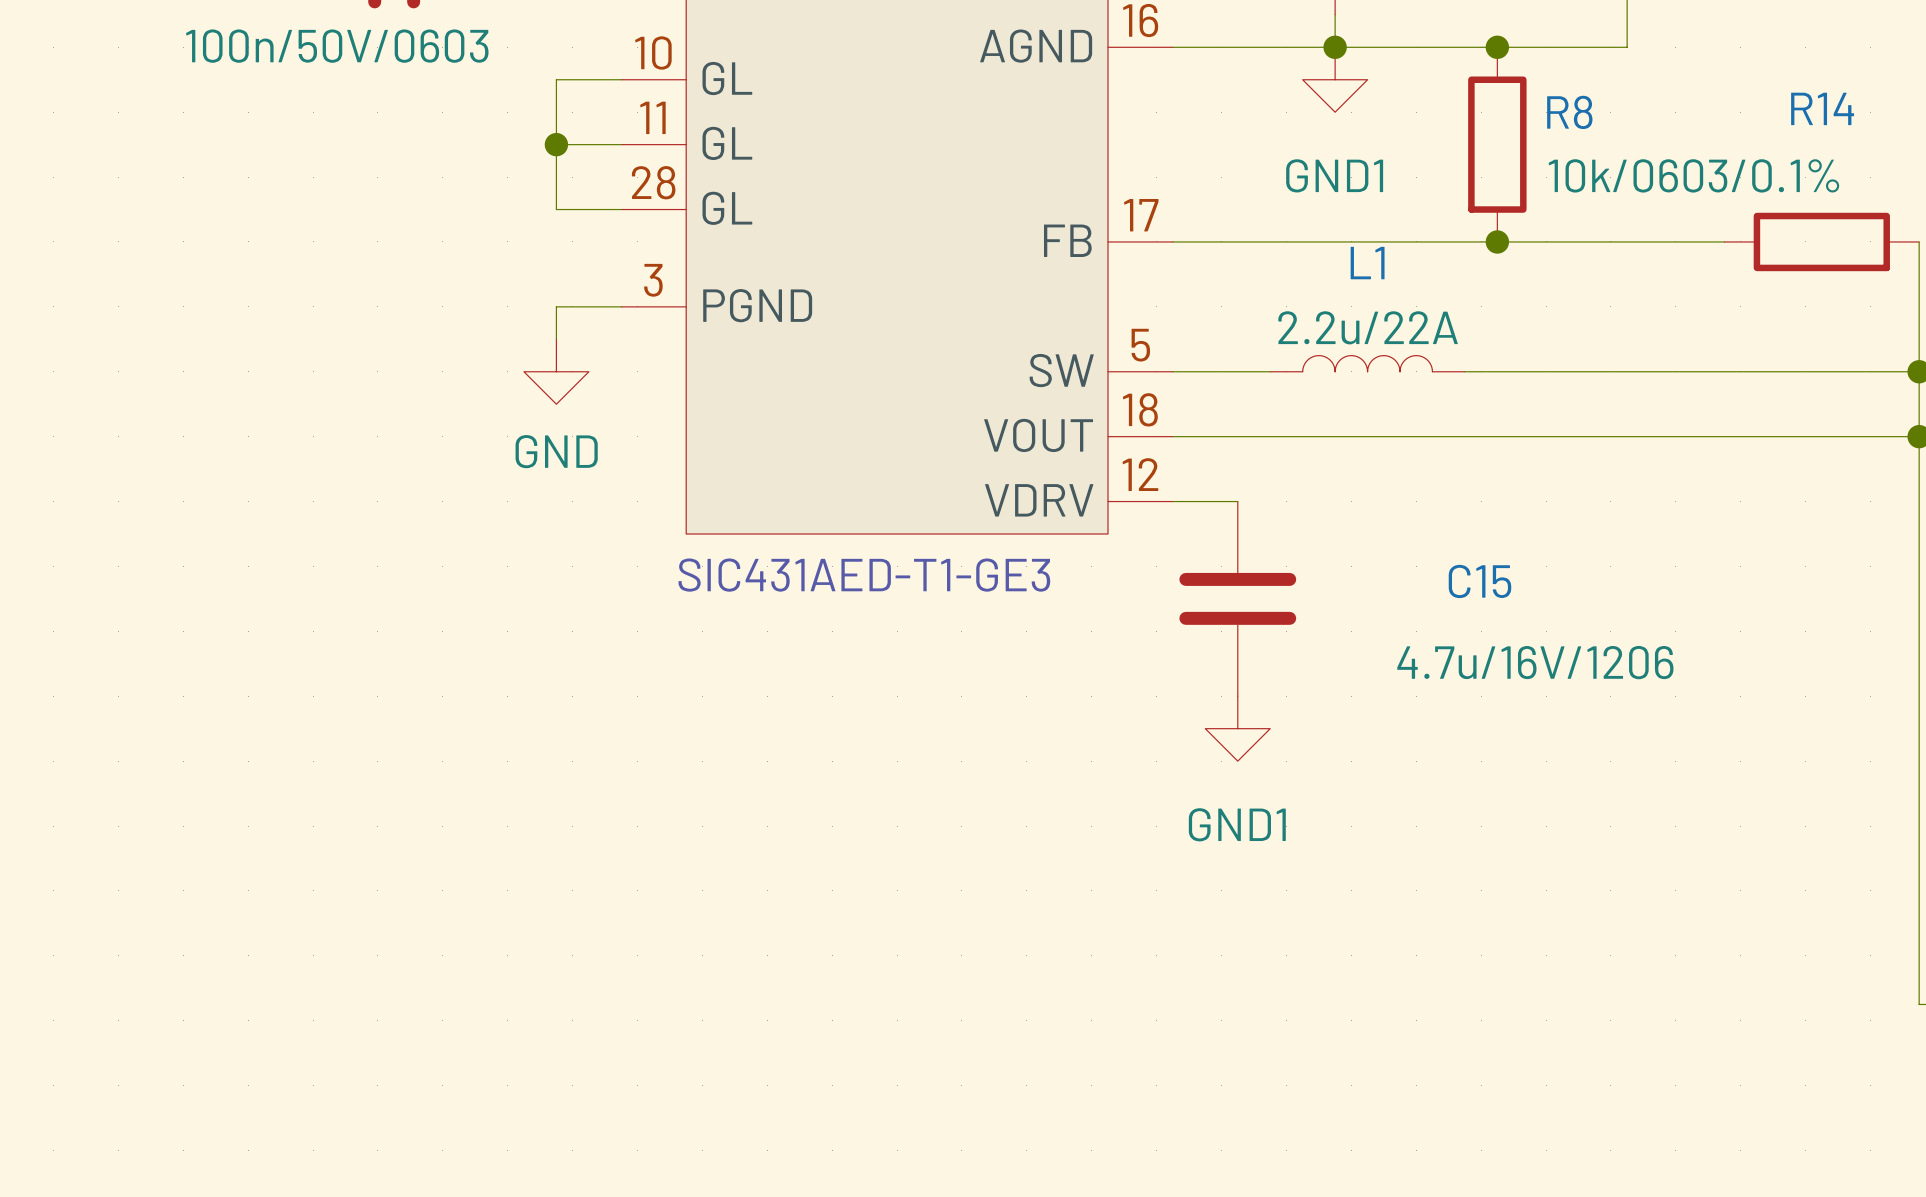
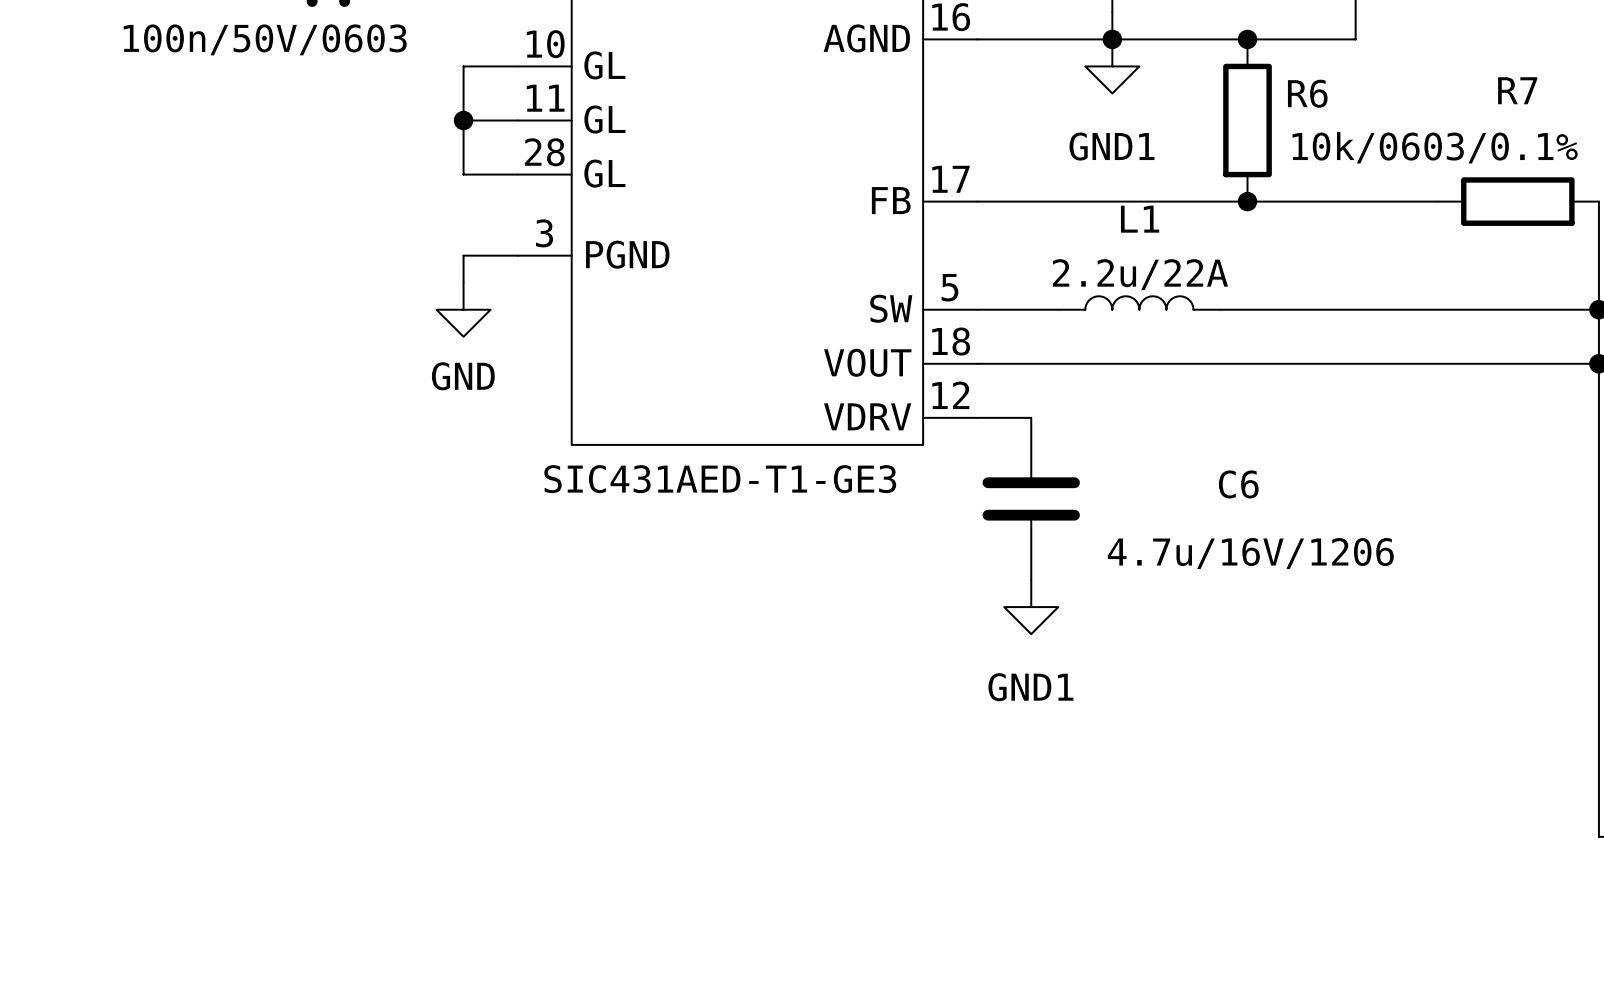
R14 name: R14 (1822, 108) -> R7 (1517, 90)
R8 name: R8 (1569, 112) -> R6 (1307, 93)
C15 name: C15 (1480, 581) -> C6 (1238, 484)

